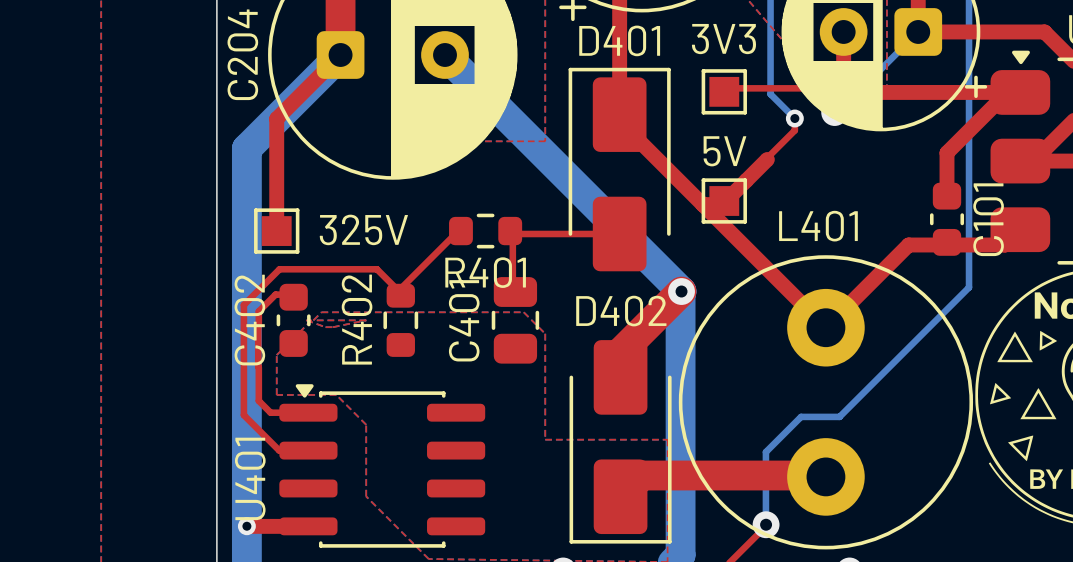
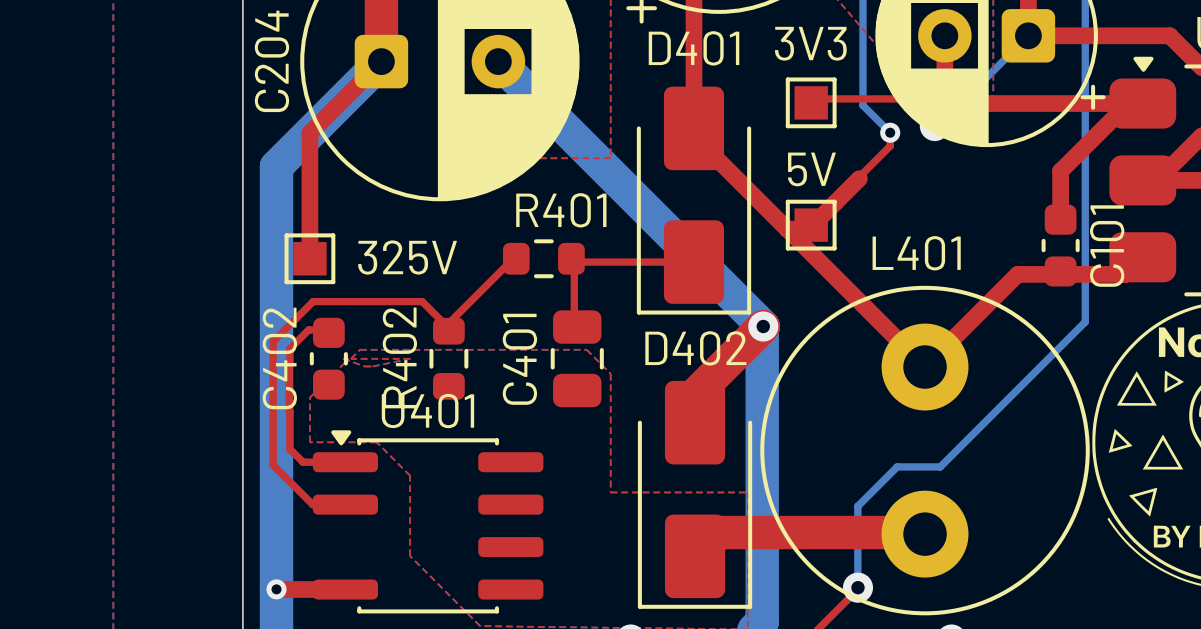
D401 rotation: 0° (619, 169) -> 180° (693, 200)
R401 name position: R401 (485, 272) -> R401 (561, 210)
U401 footprint: [279, 384, 486, 548] -> [312, 430, 544, 614]
U401 name position: U401 (250, 478) -> U401 (427, 411)

